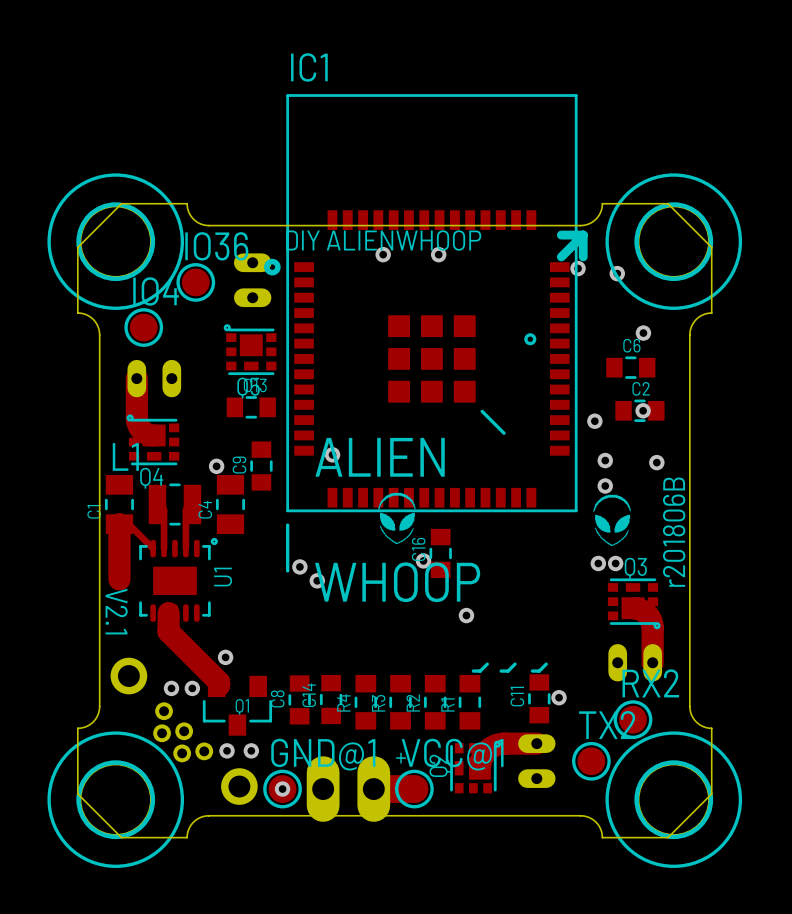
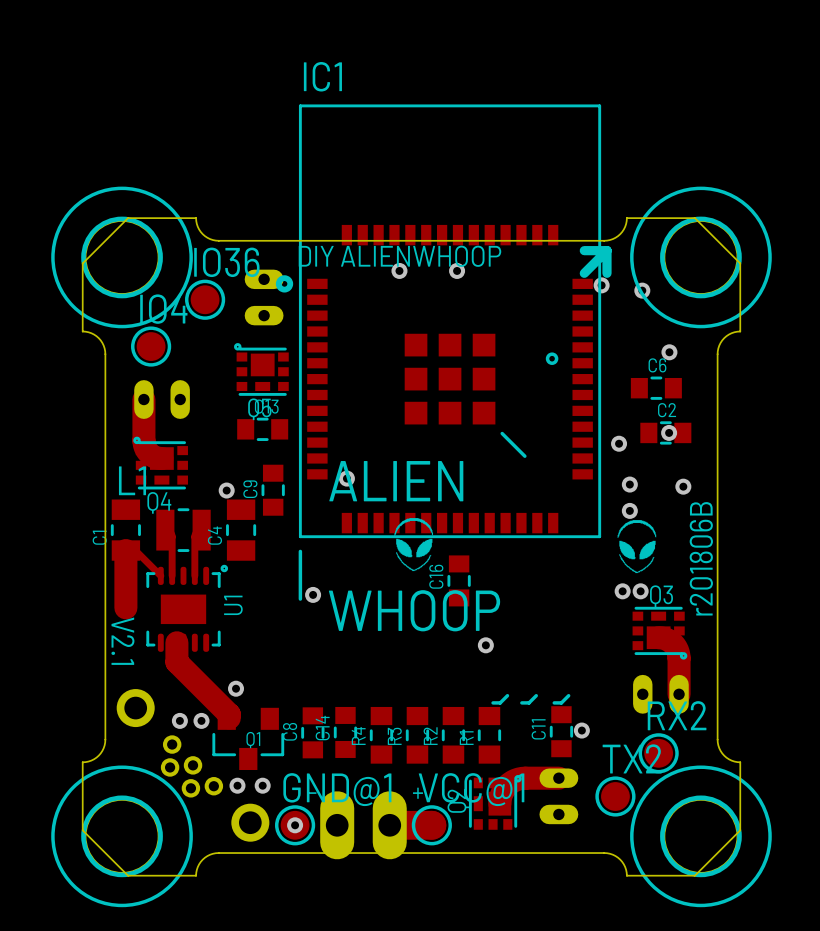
via: (423, 560) -> none
via: (317, 580) -> none

